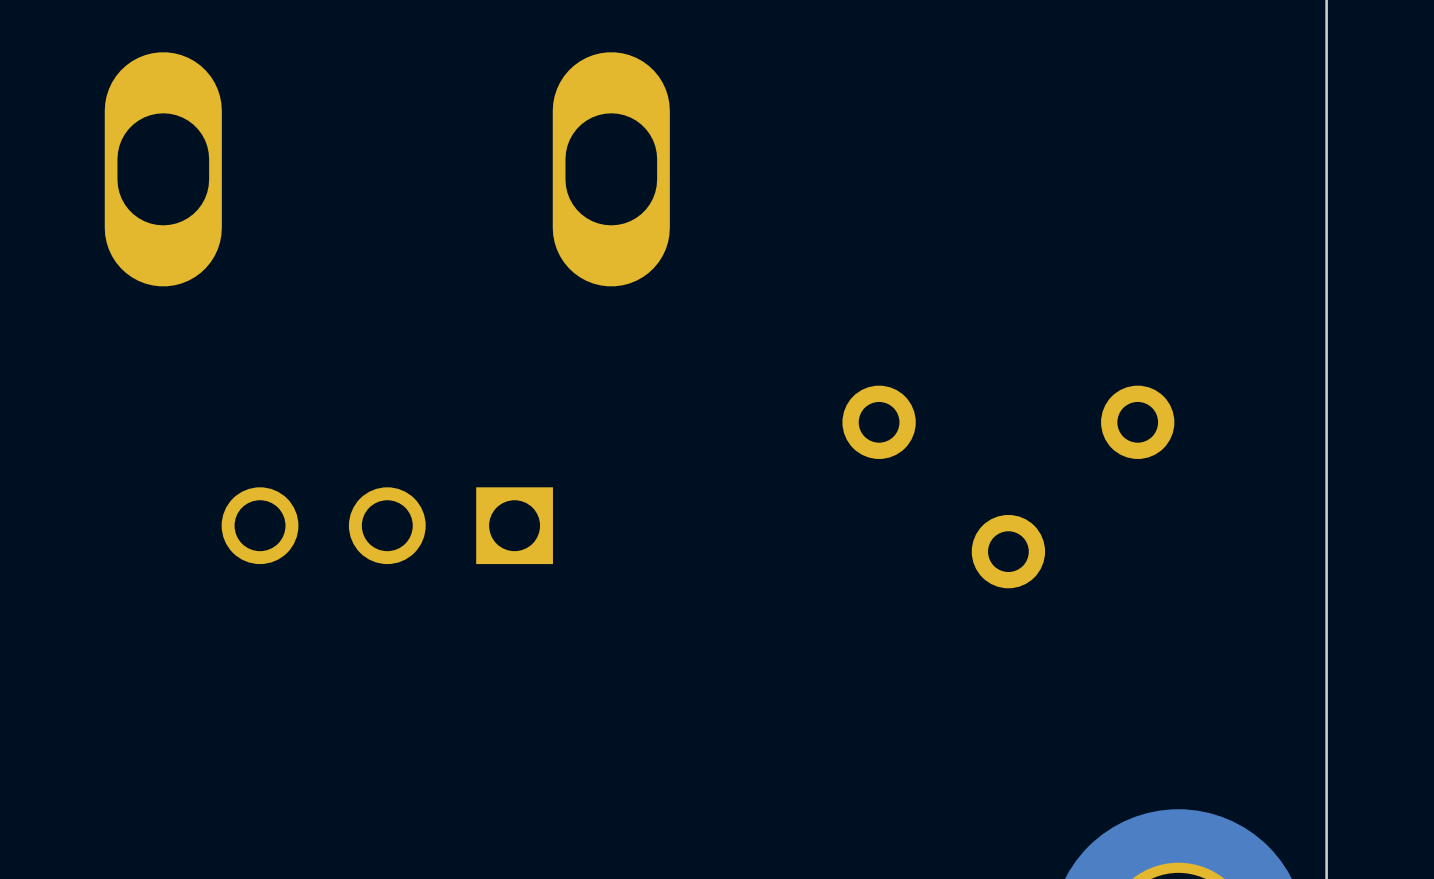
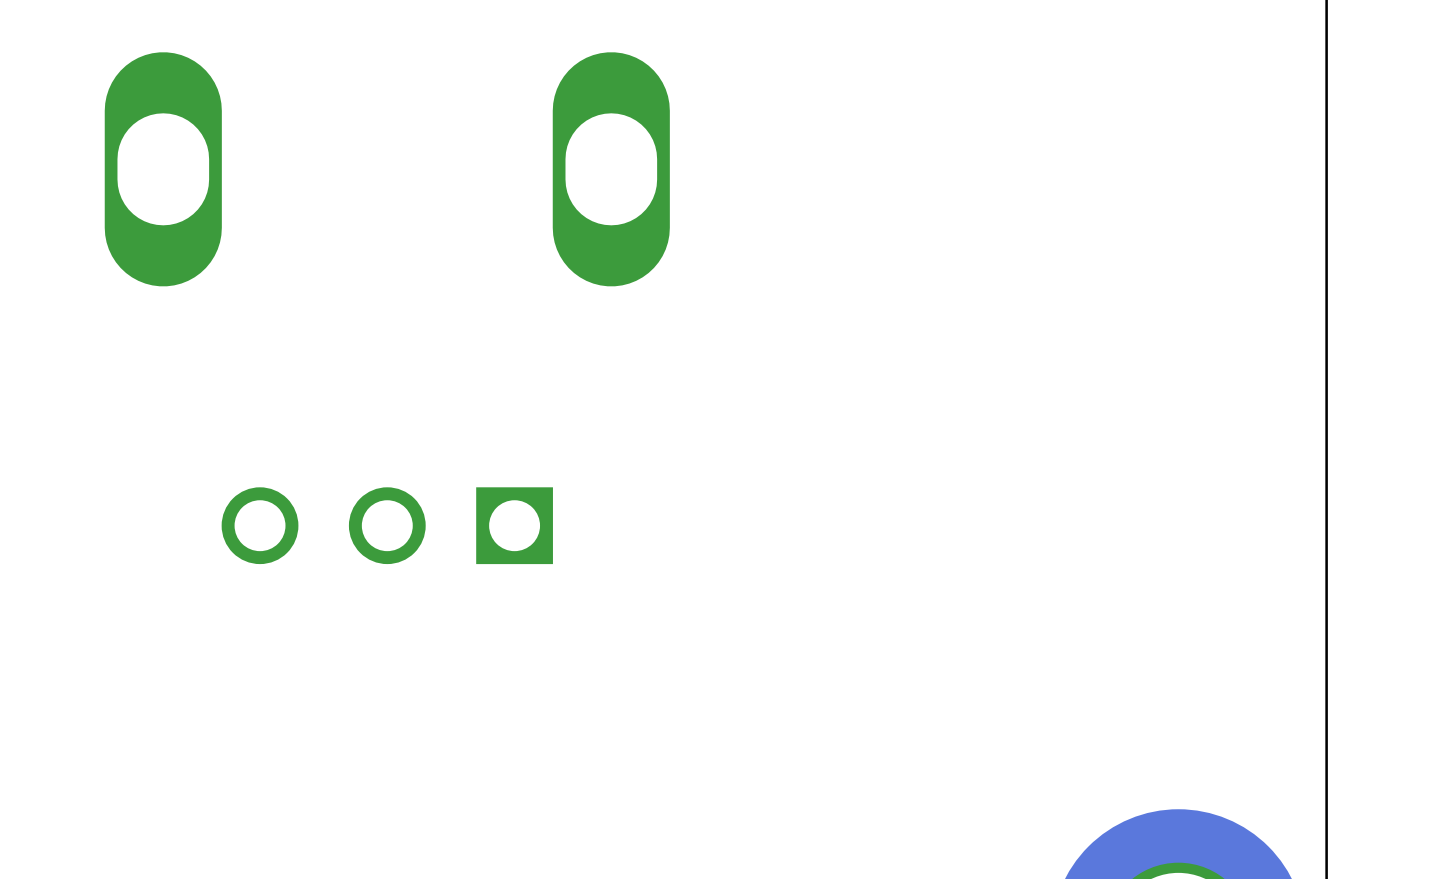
part: (1008, 486) -> none

